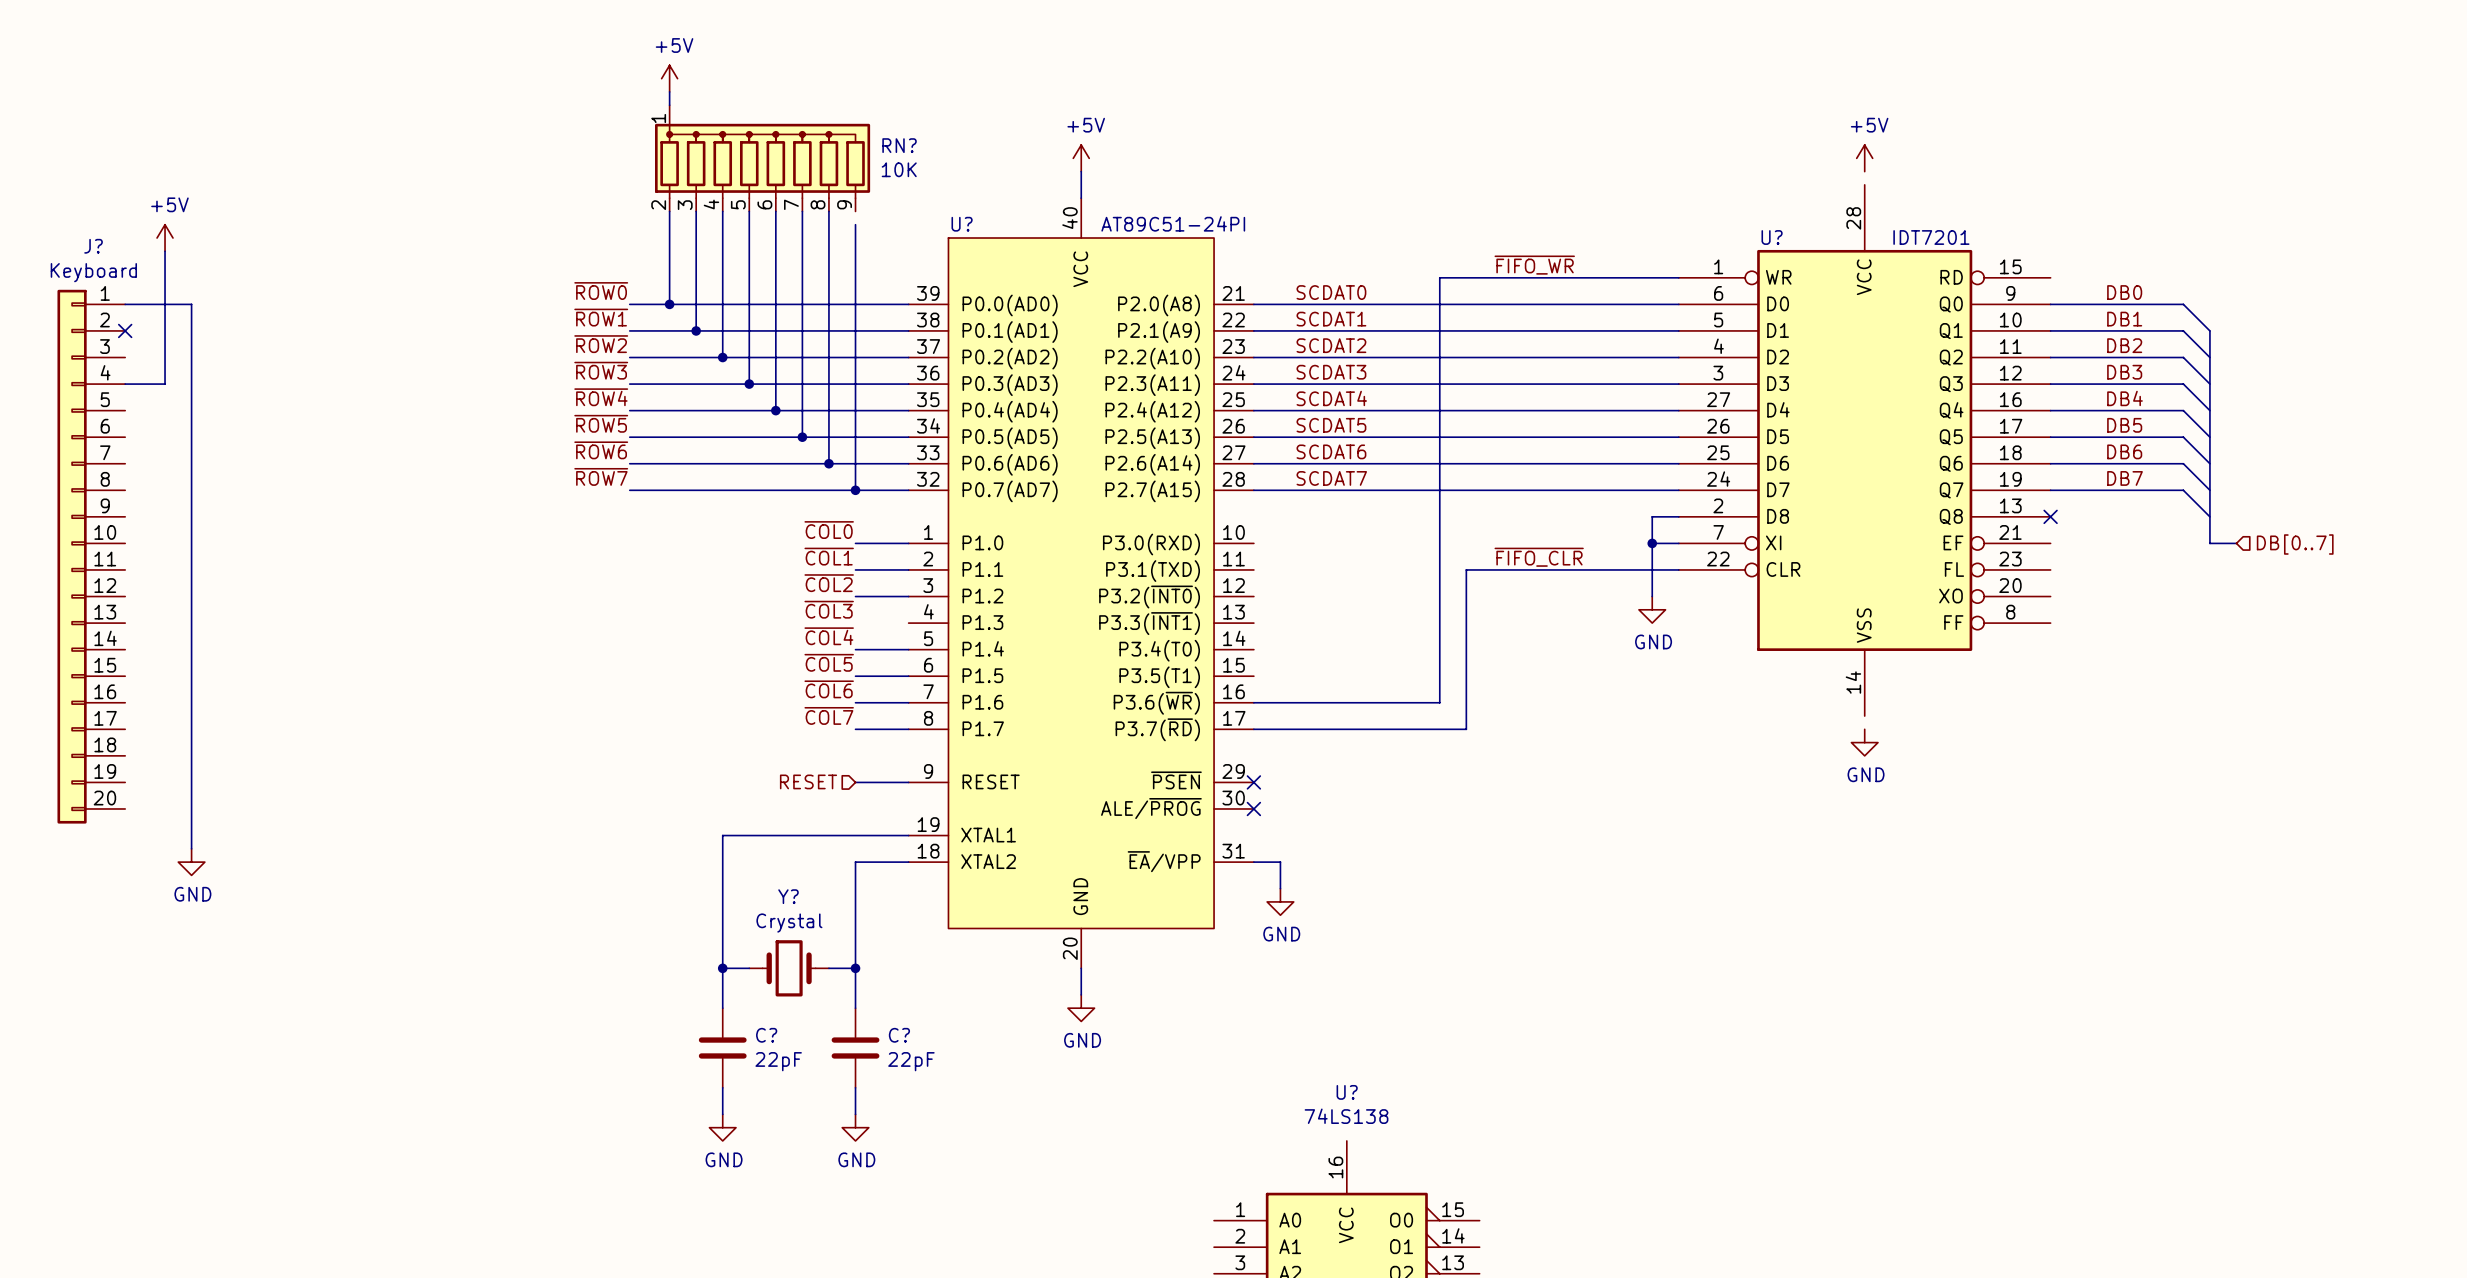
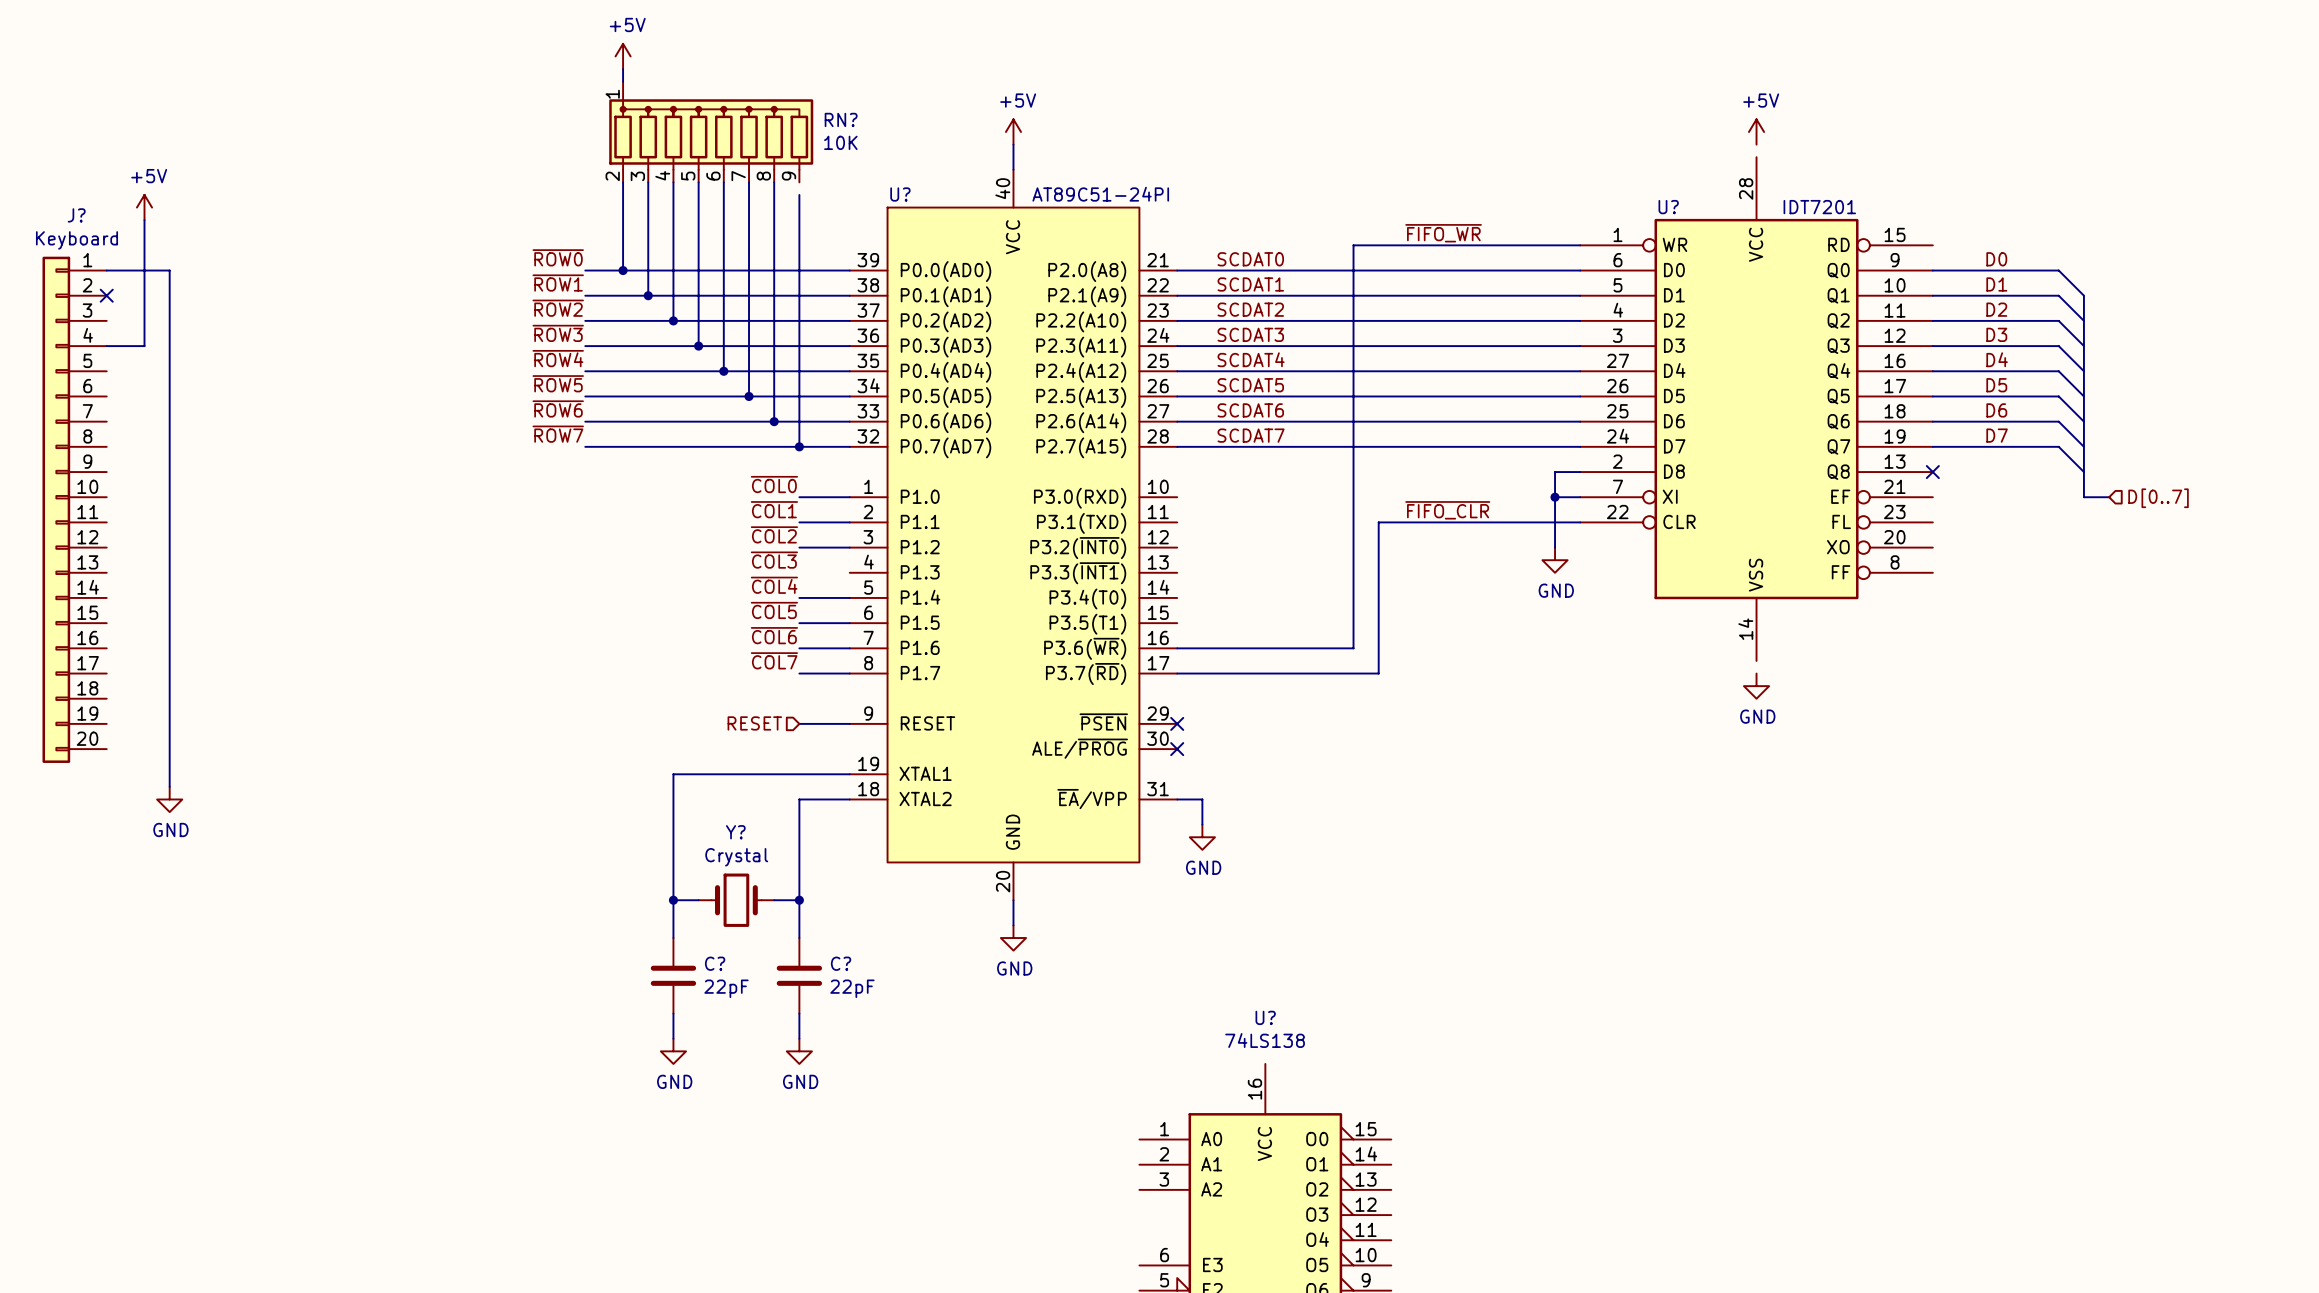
label: DB0 (2124, 292) -> D0 (1996, 259)
label: DB1 (2124, 319) -> D1 (1996, 284)
label: DB2 (2124, 345) -> D2 (1996, 309)
label: DB3 (2124, 372) -> D3 (1996, 334)
label: DB4 (2125, 398) -> D4 (1997, 359)
label: DB5 (2124, 425) -> D5 (1996, 385)
label: DB6 (2124, 451) -> D6 (1996, 410)
label: DB7 (2125, 478) -> D7 (1997, 435)
hierarchical label: DB[0..7] (2295, 544) -> D[0..7] (2158, 498)

